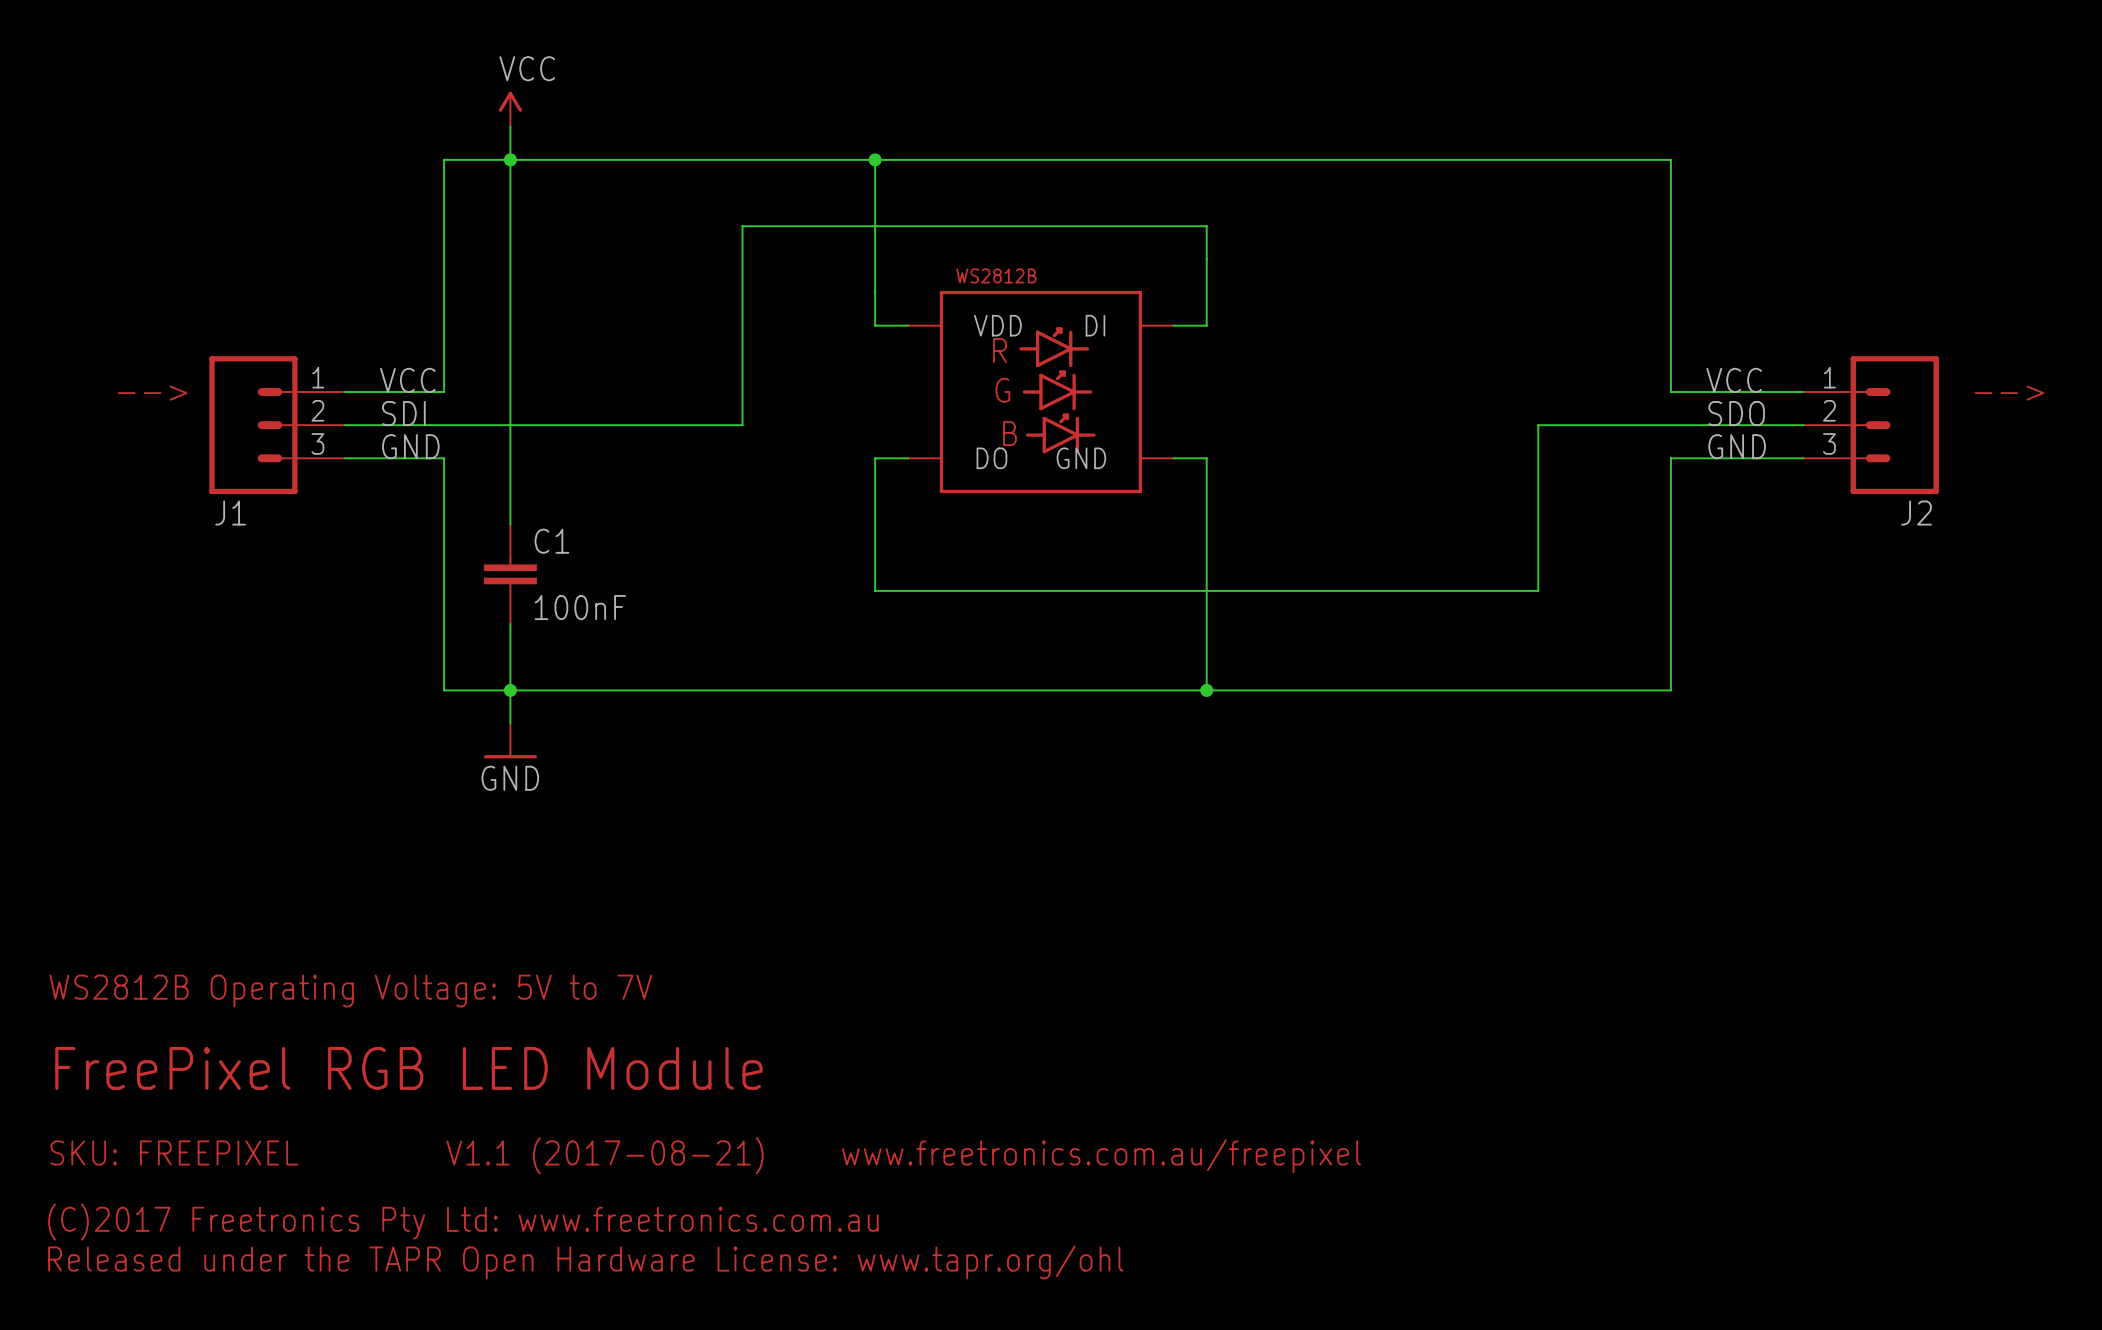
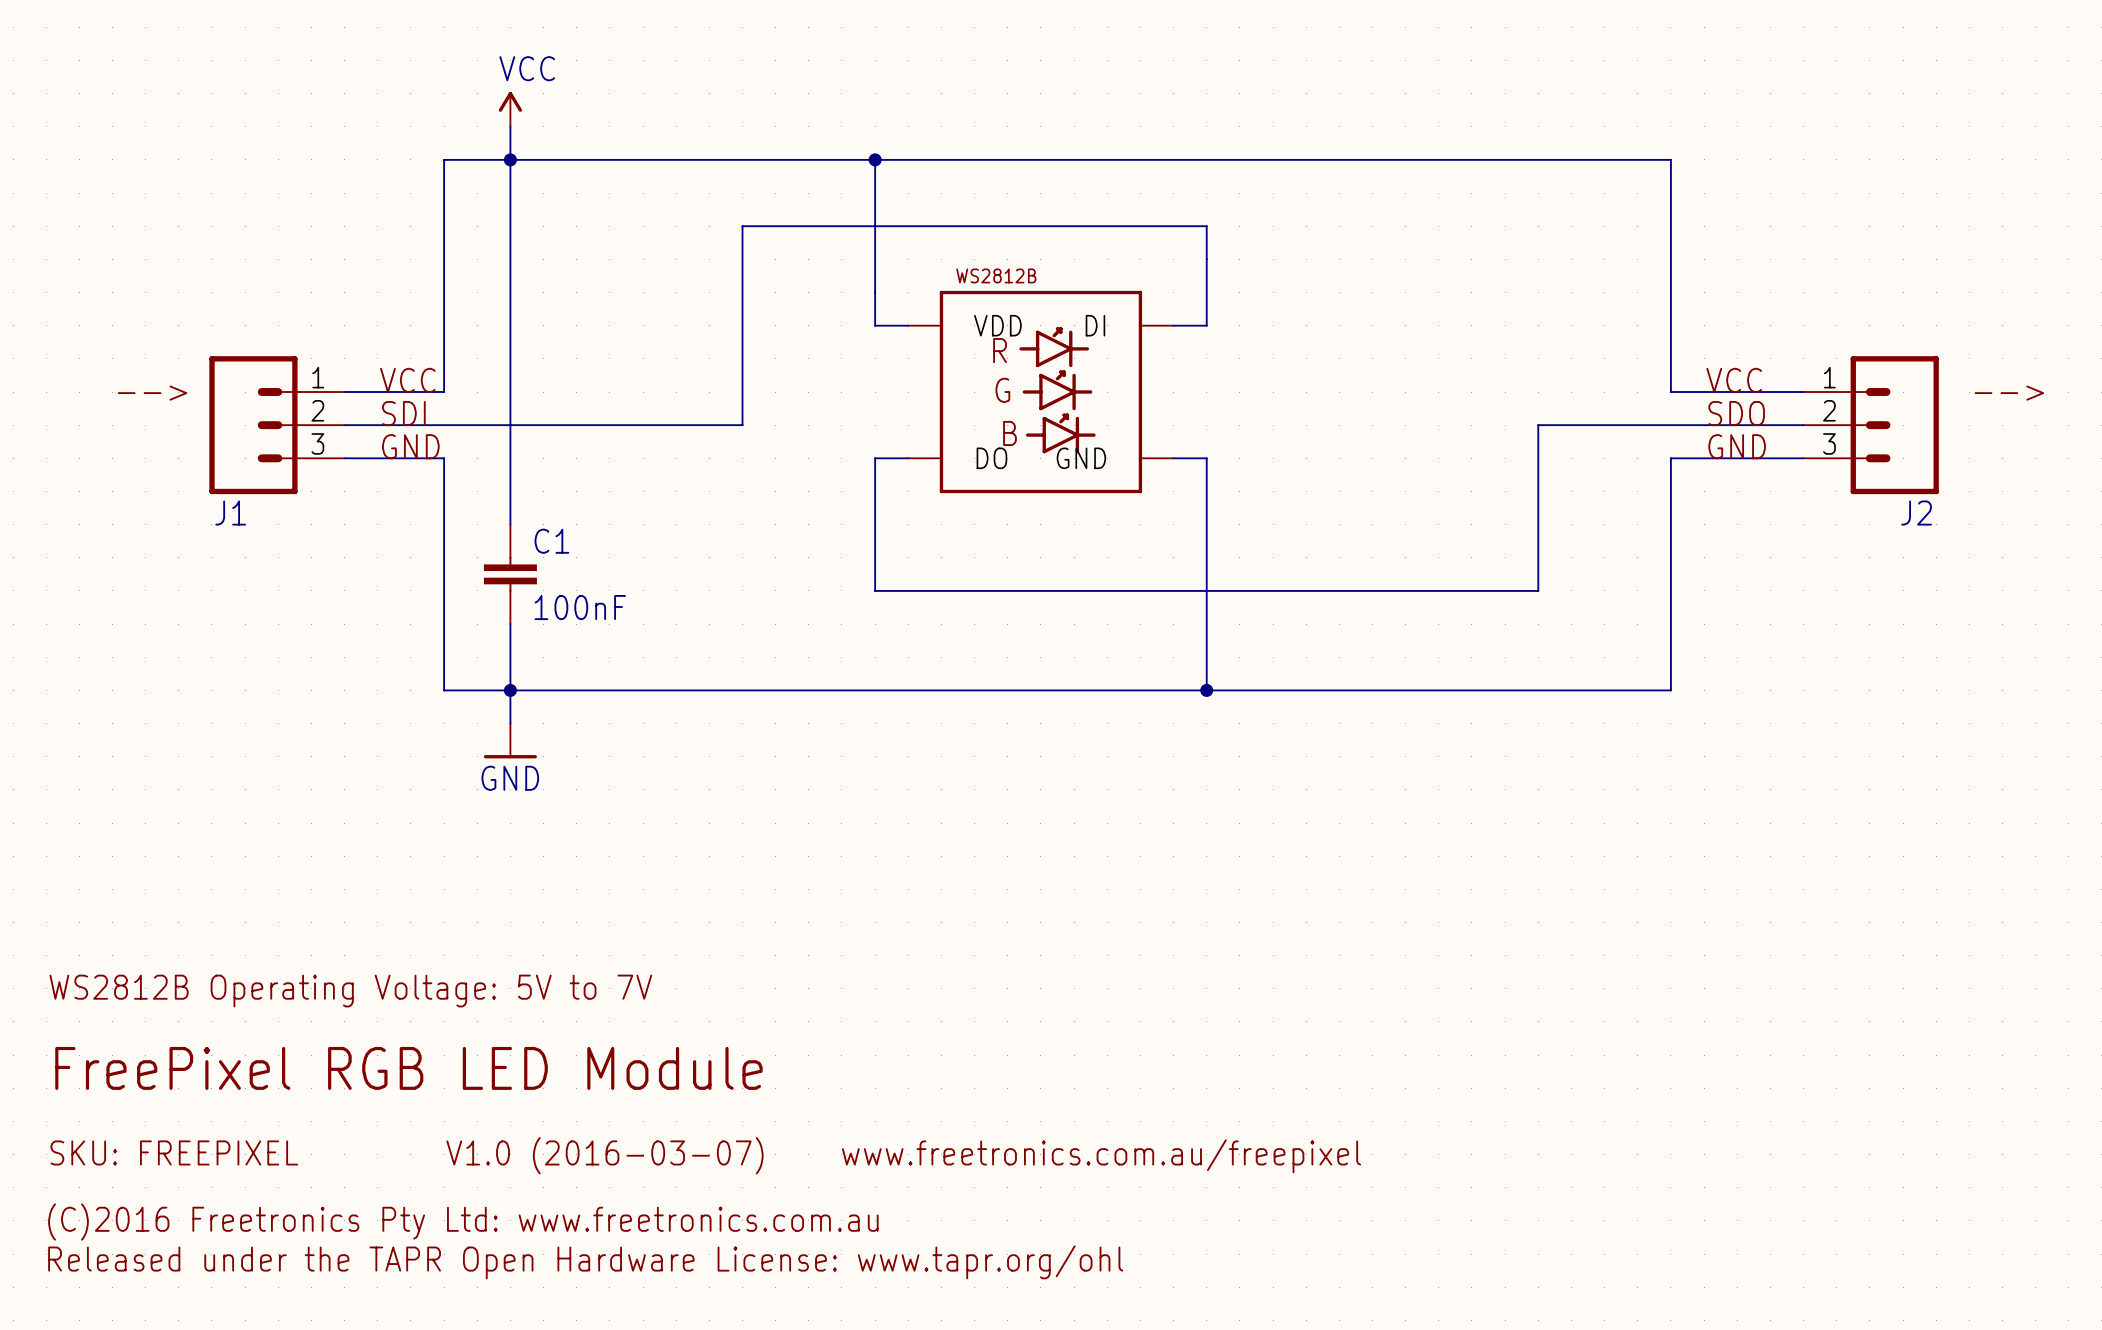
text: V1.1 (2017-08-21) (604, 1155) -> V1.0 (2016-03-07) (604, 1155)
text: (C)2017 Freetronics Pty Ltd: www.freetronics.com.au (463, 1222) -> (C)2016 Freetronics Pty Ltd: www.freetronics.com.au (463, 1222)

